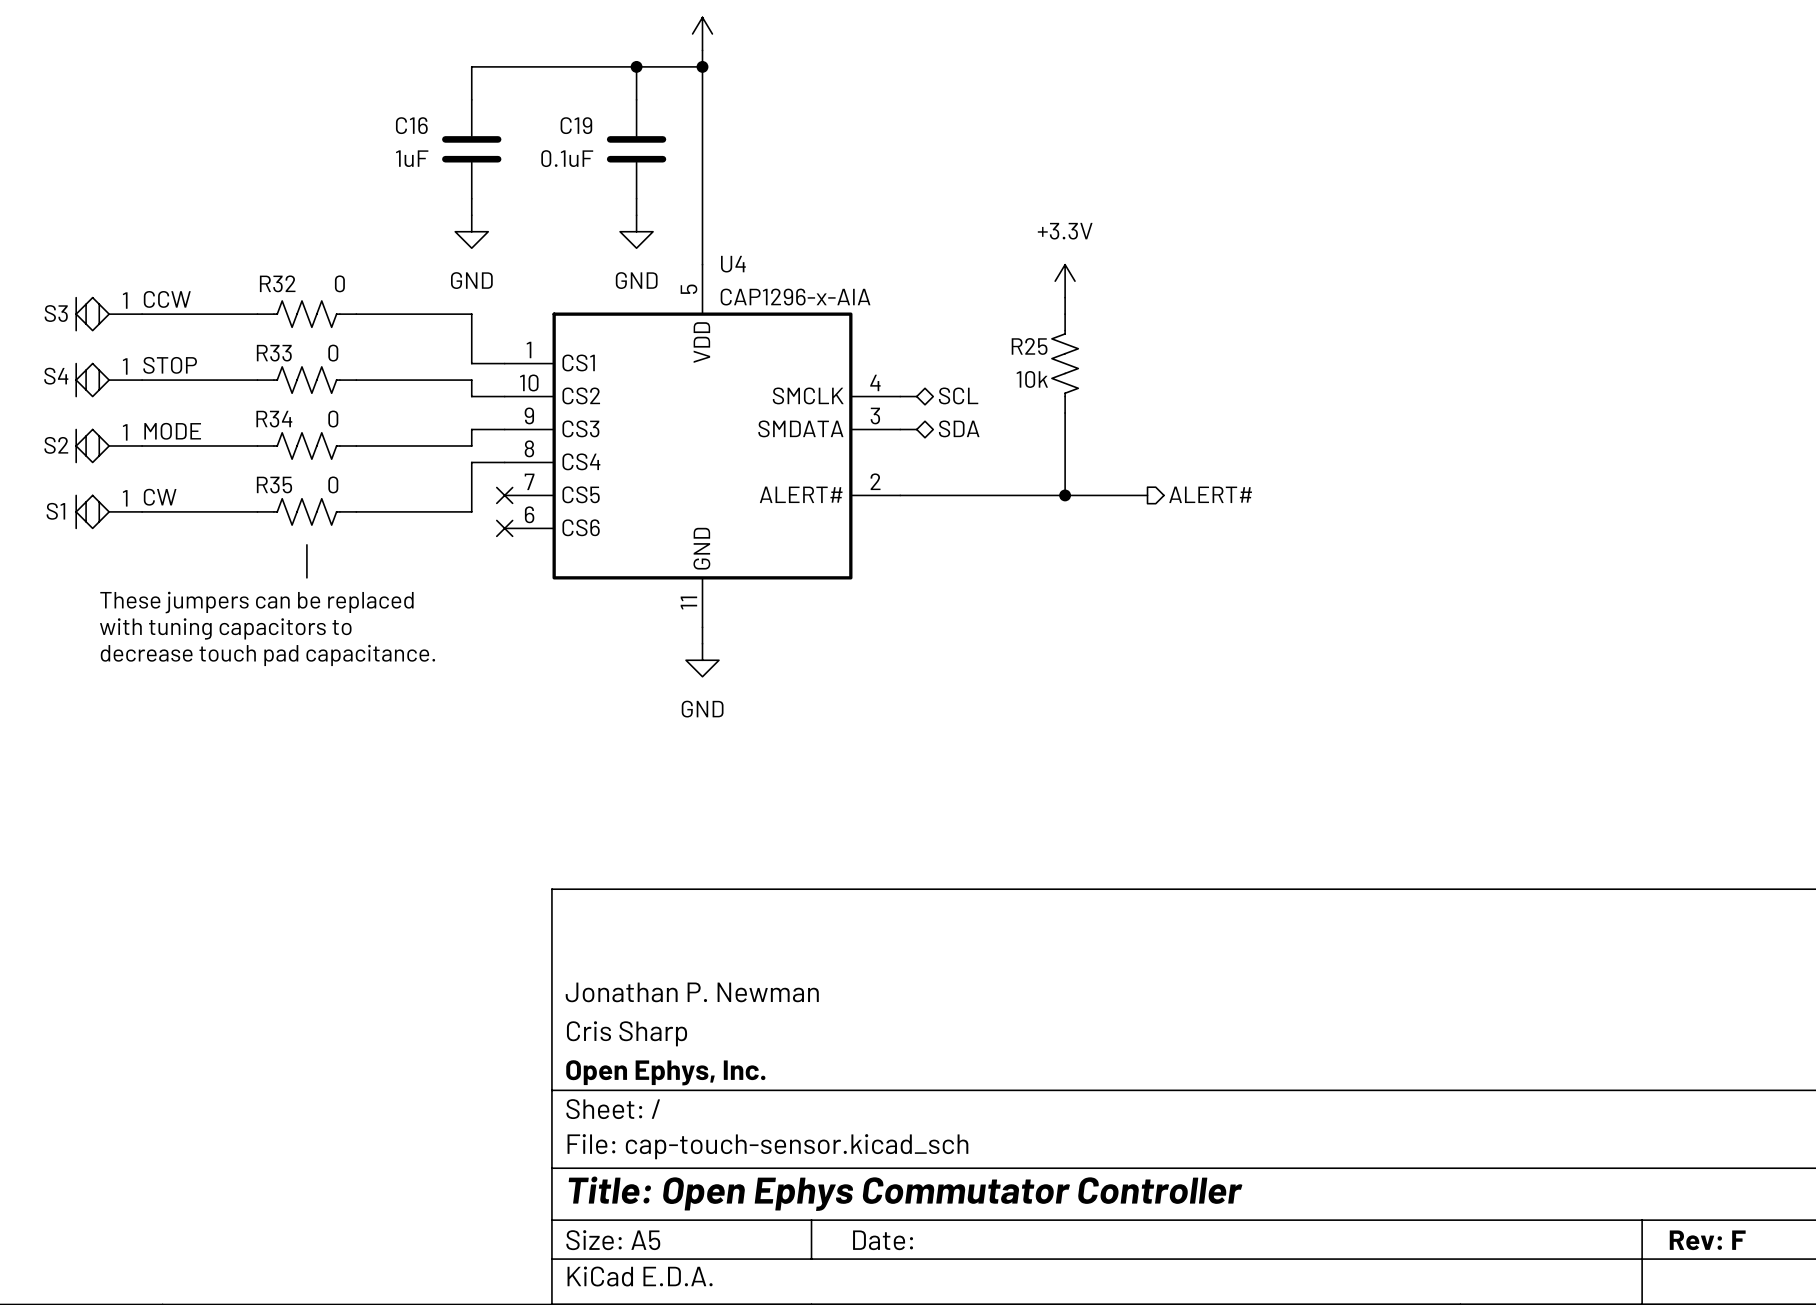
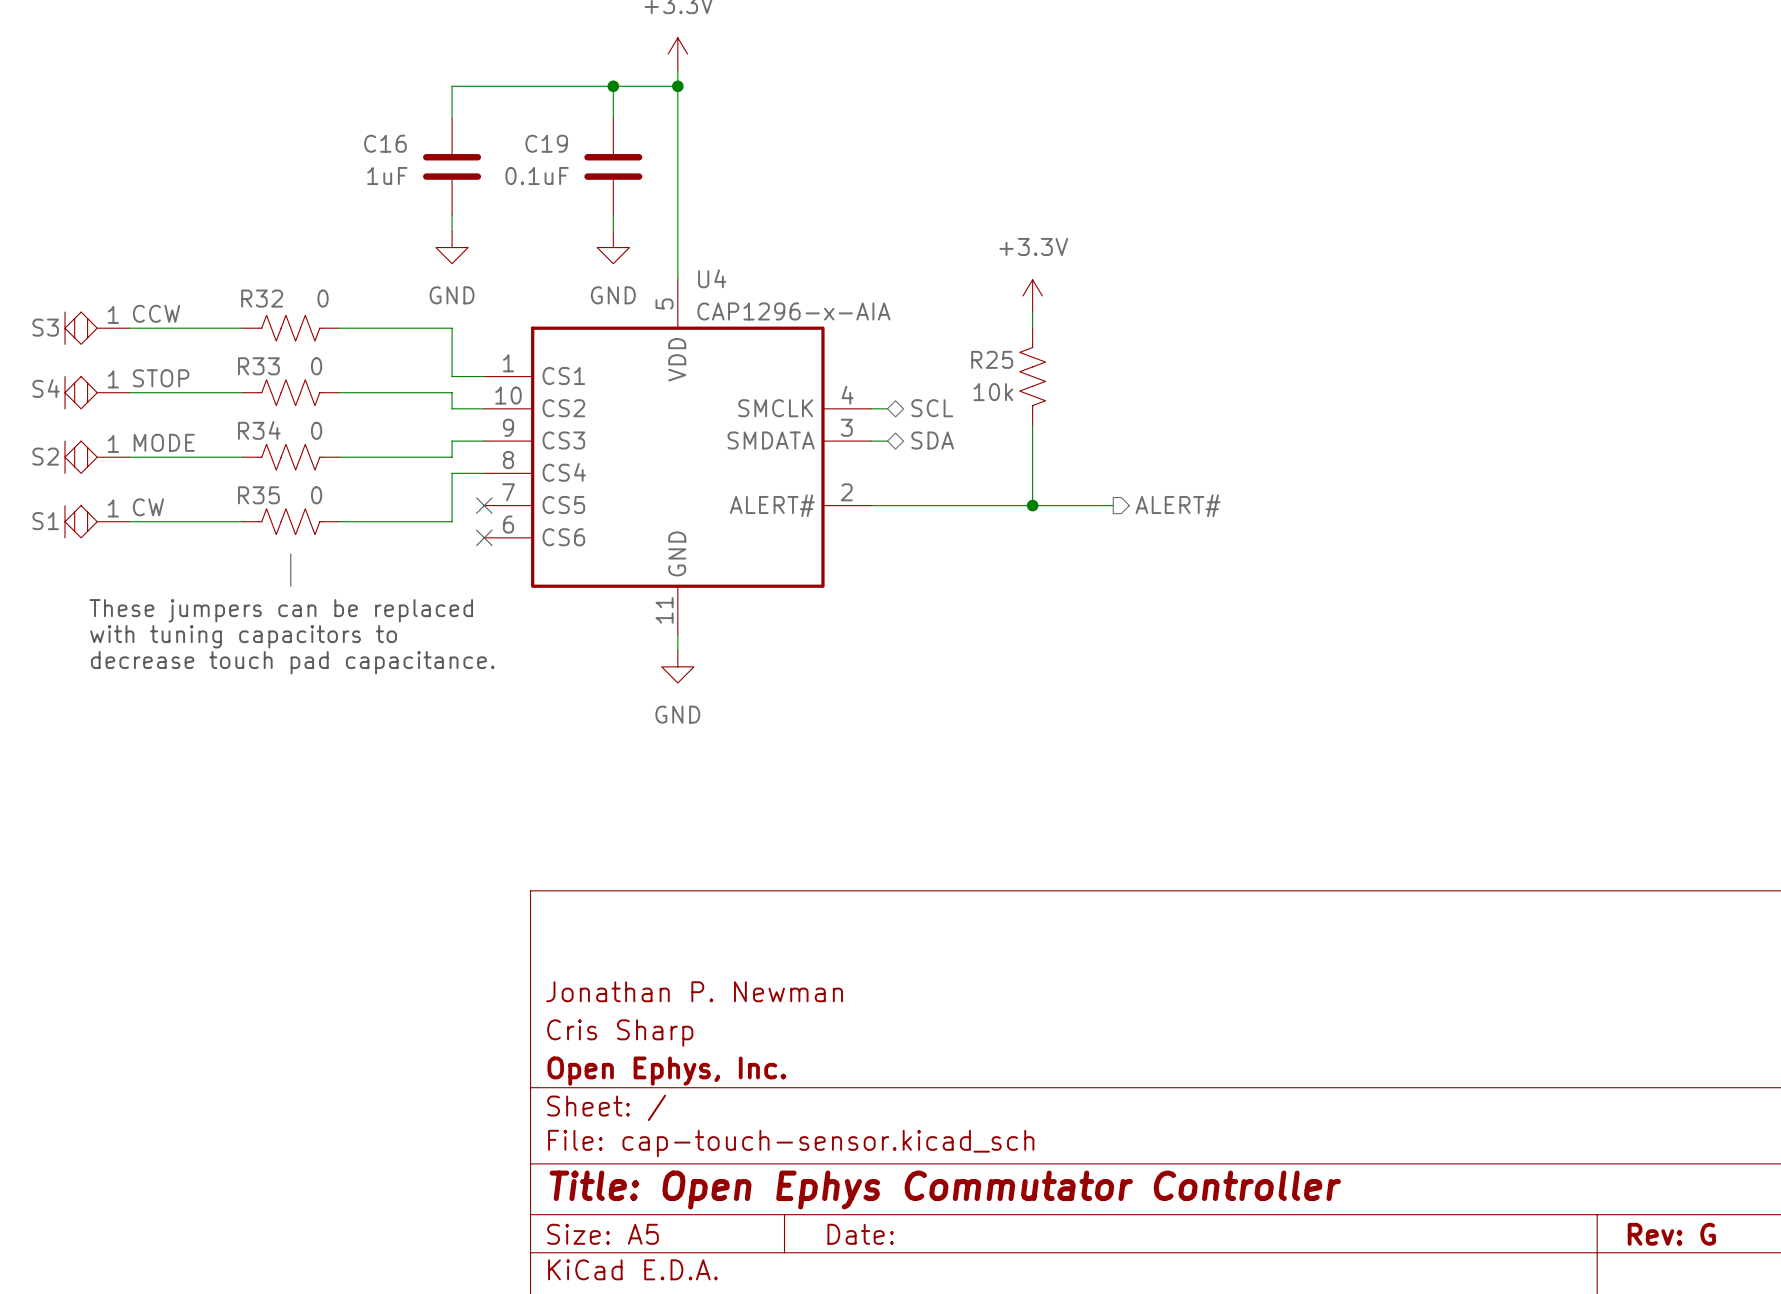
title block: Rev: F (1707, 1240) -> Rev: G (1671, 1234)

